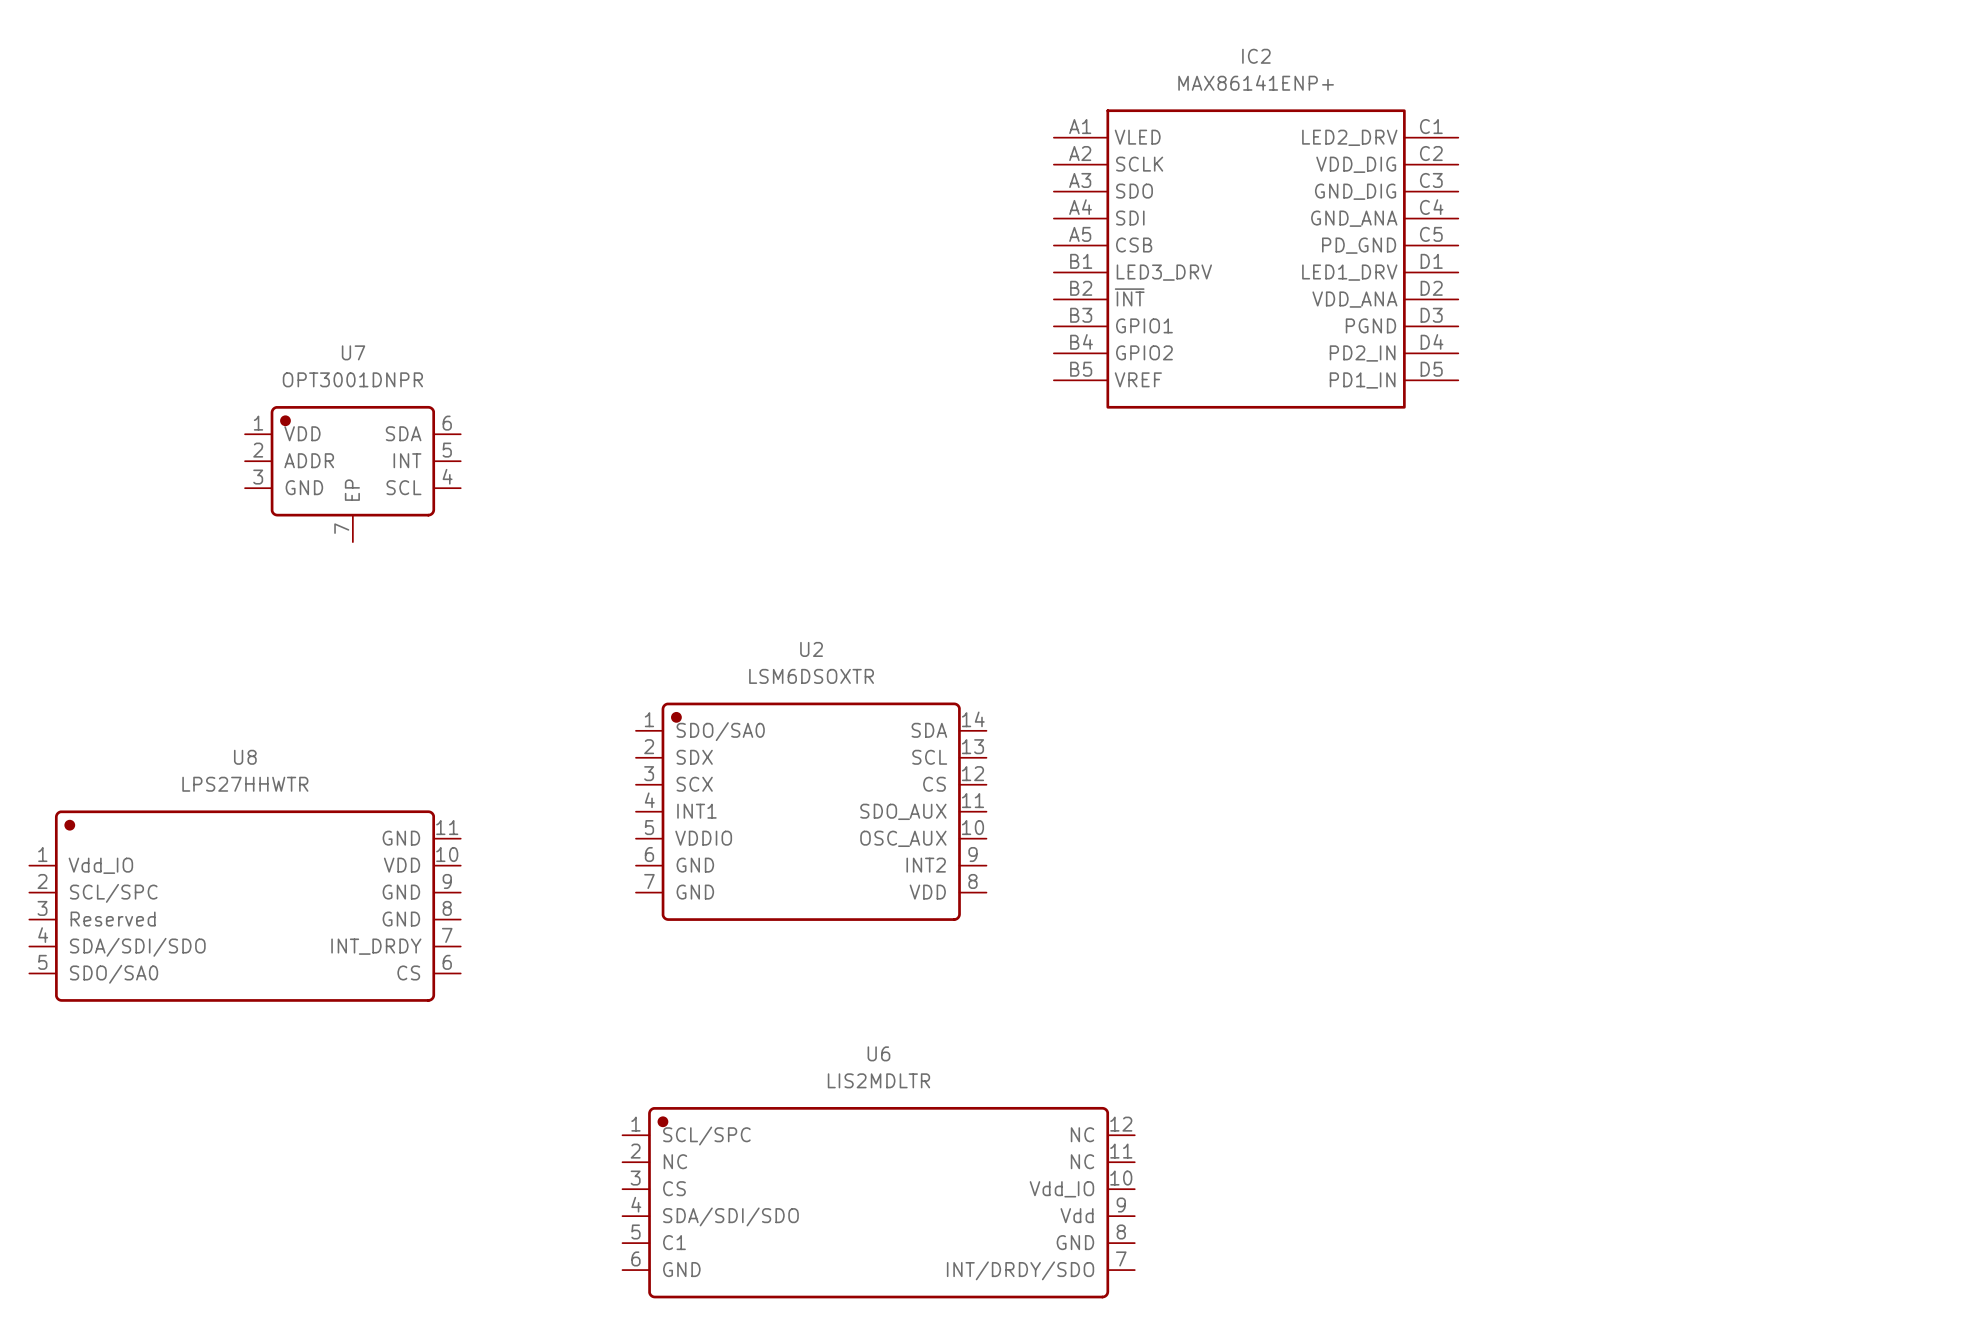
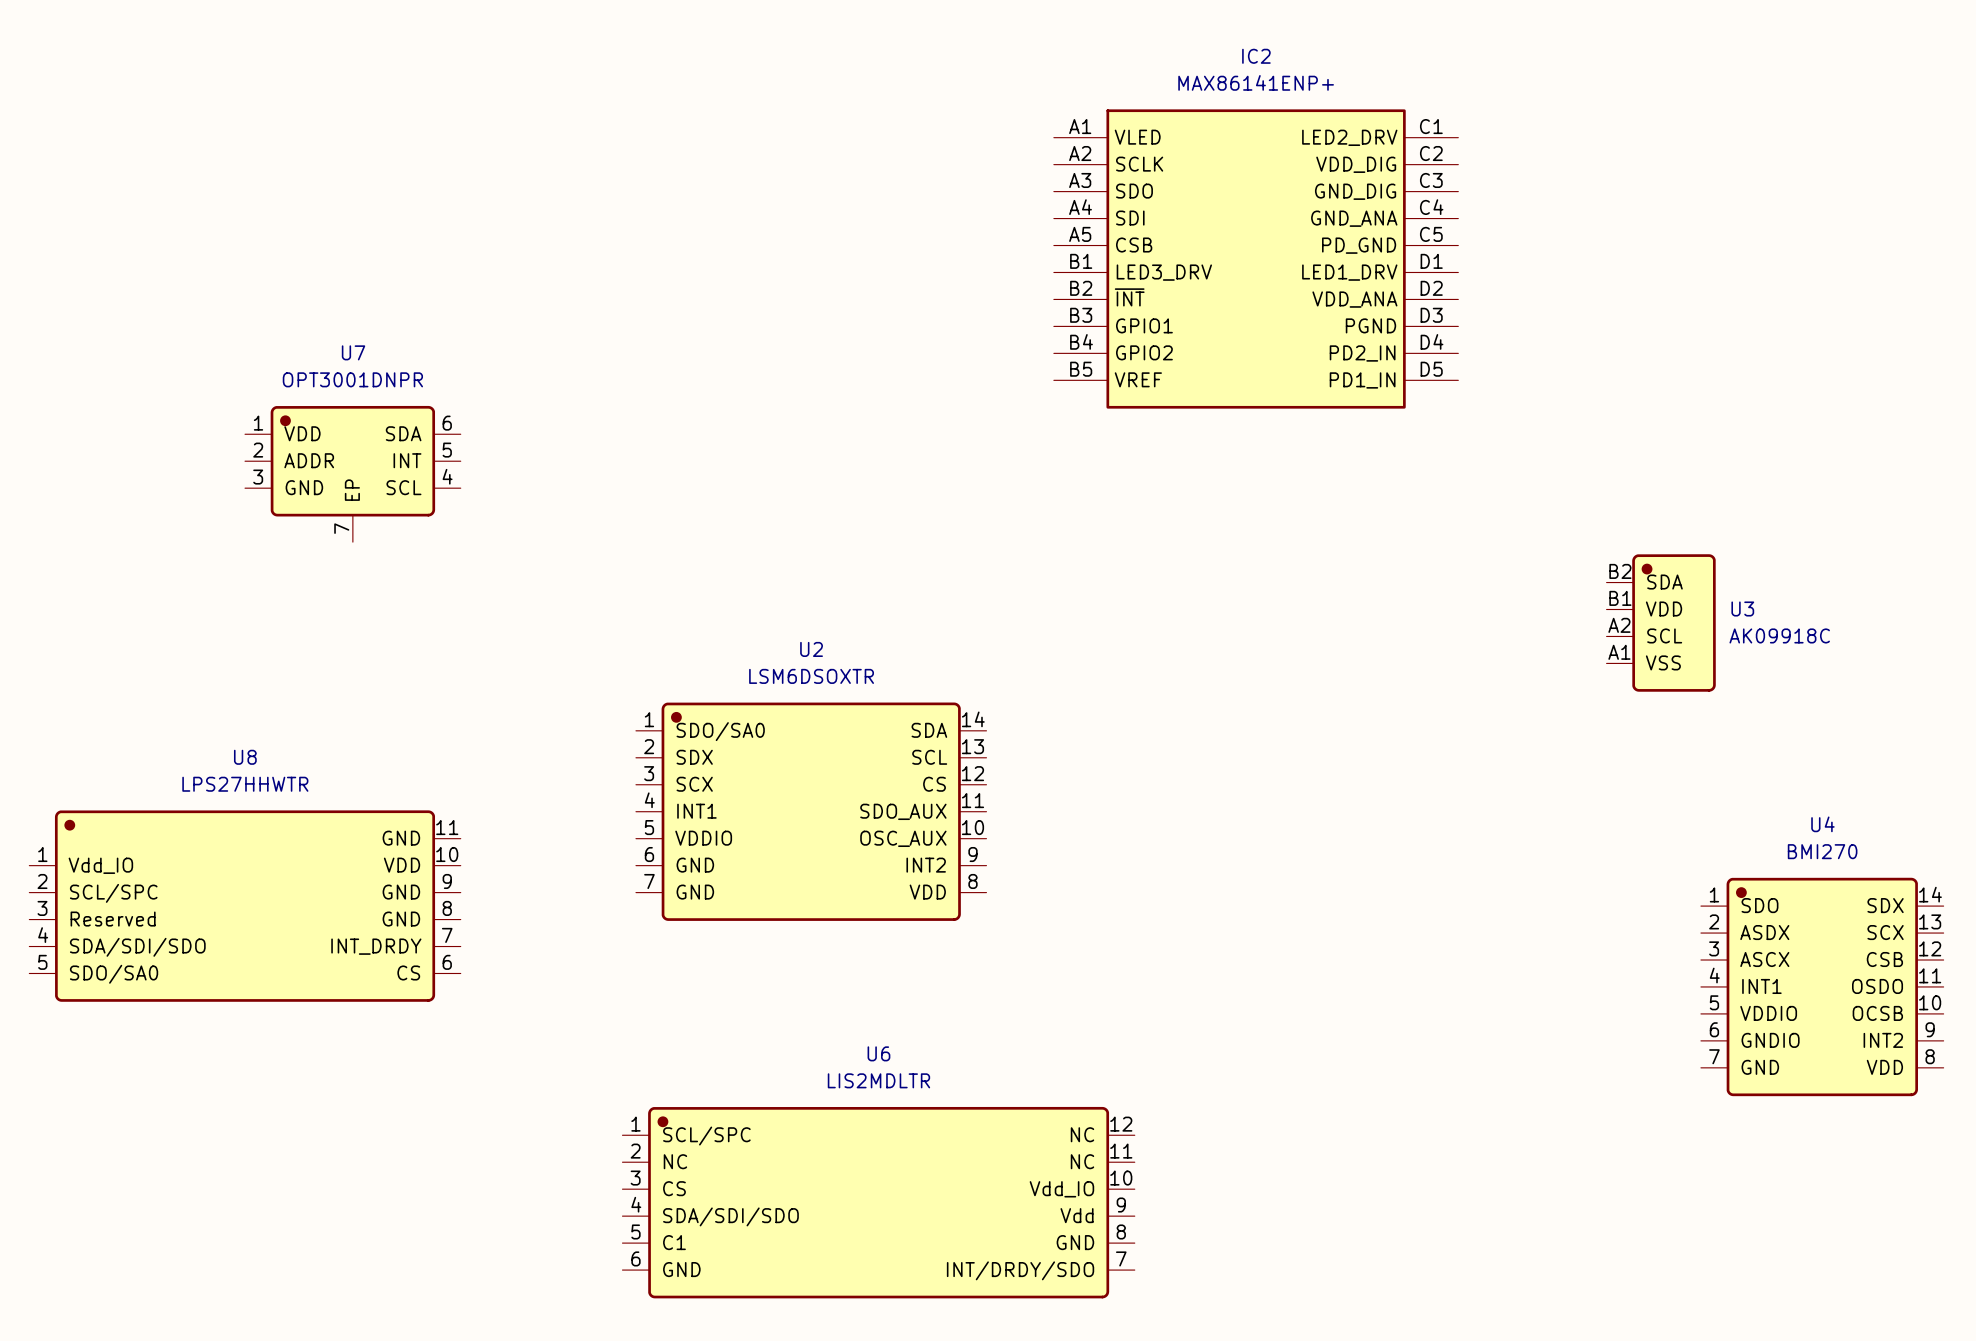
U3: none -> AK09918C (1661, 622)
U4: none -> BMI270 (1822, 986)

